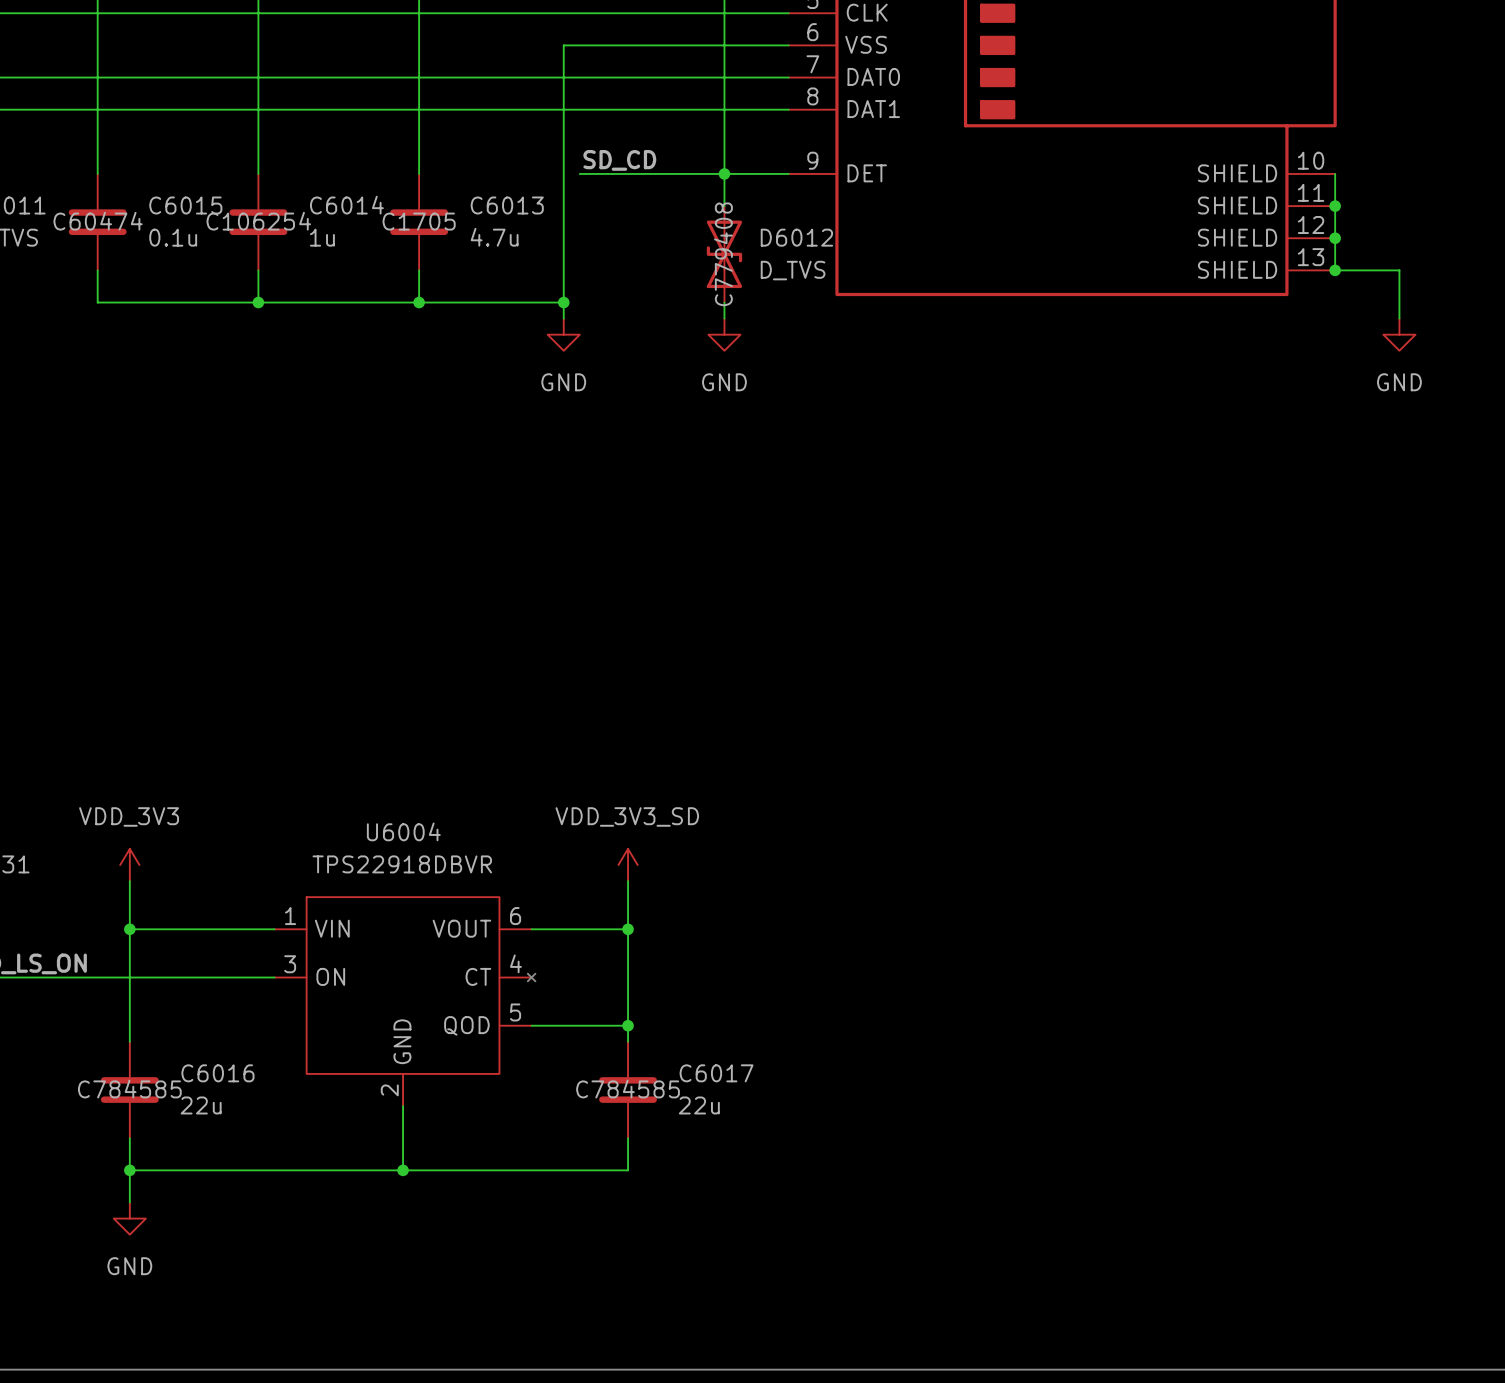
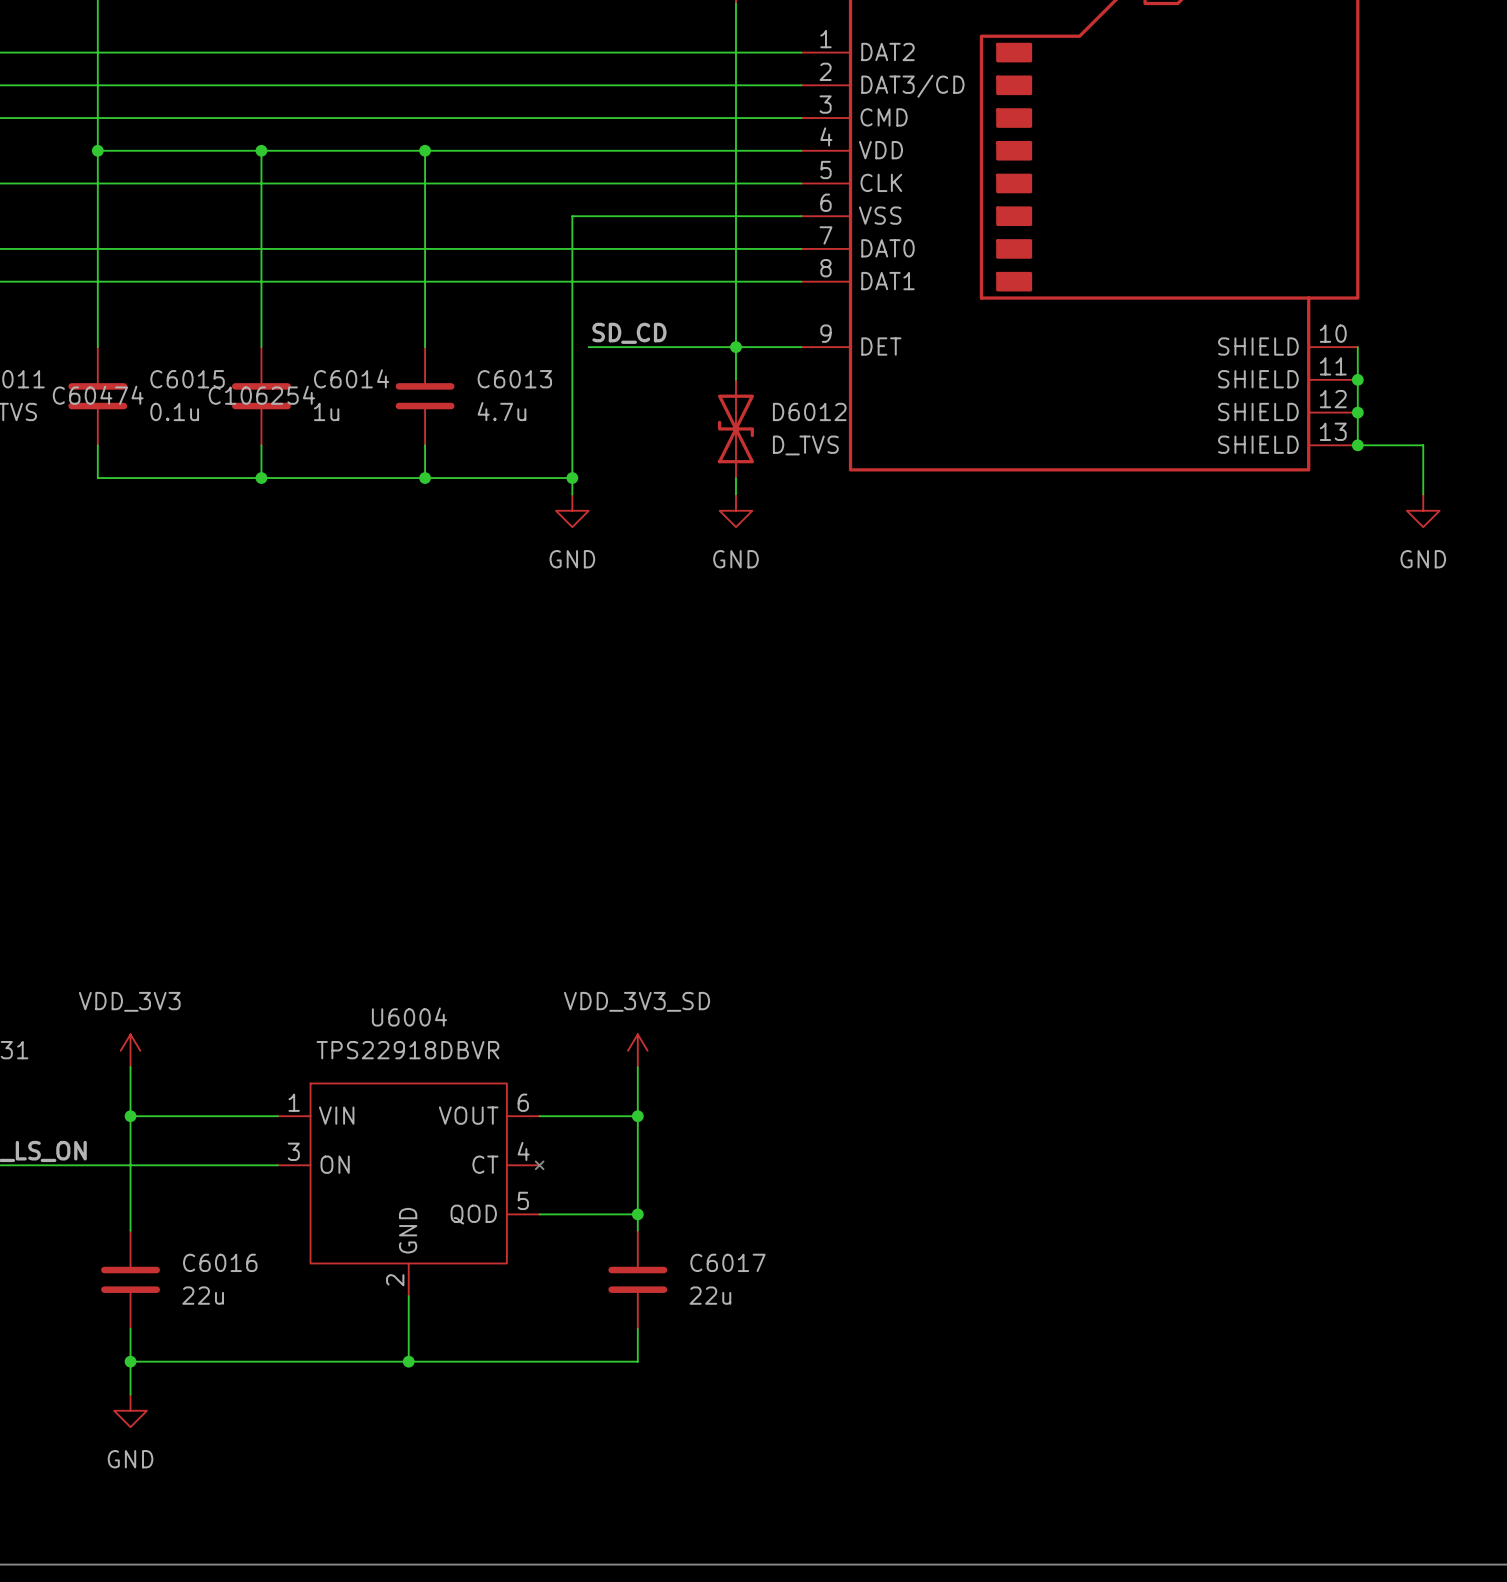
C6013 text: C1705 (419, 221) -> none
D6012 text: C779408 (723, 254) -> none
C6016 text: C784585 (129, 1089) -> none
C6017 text: C784585 (628, 1089) -> none

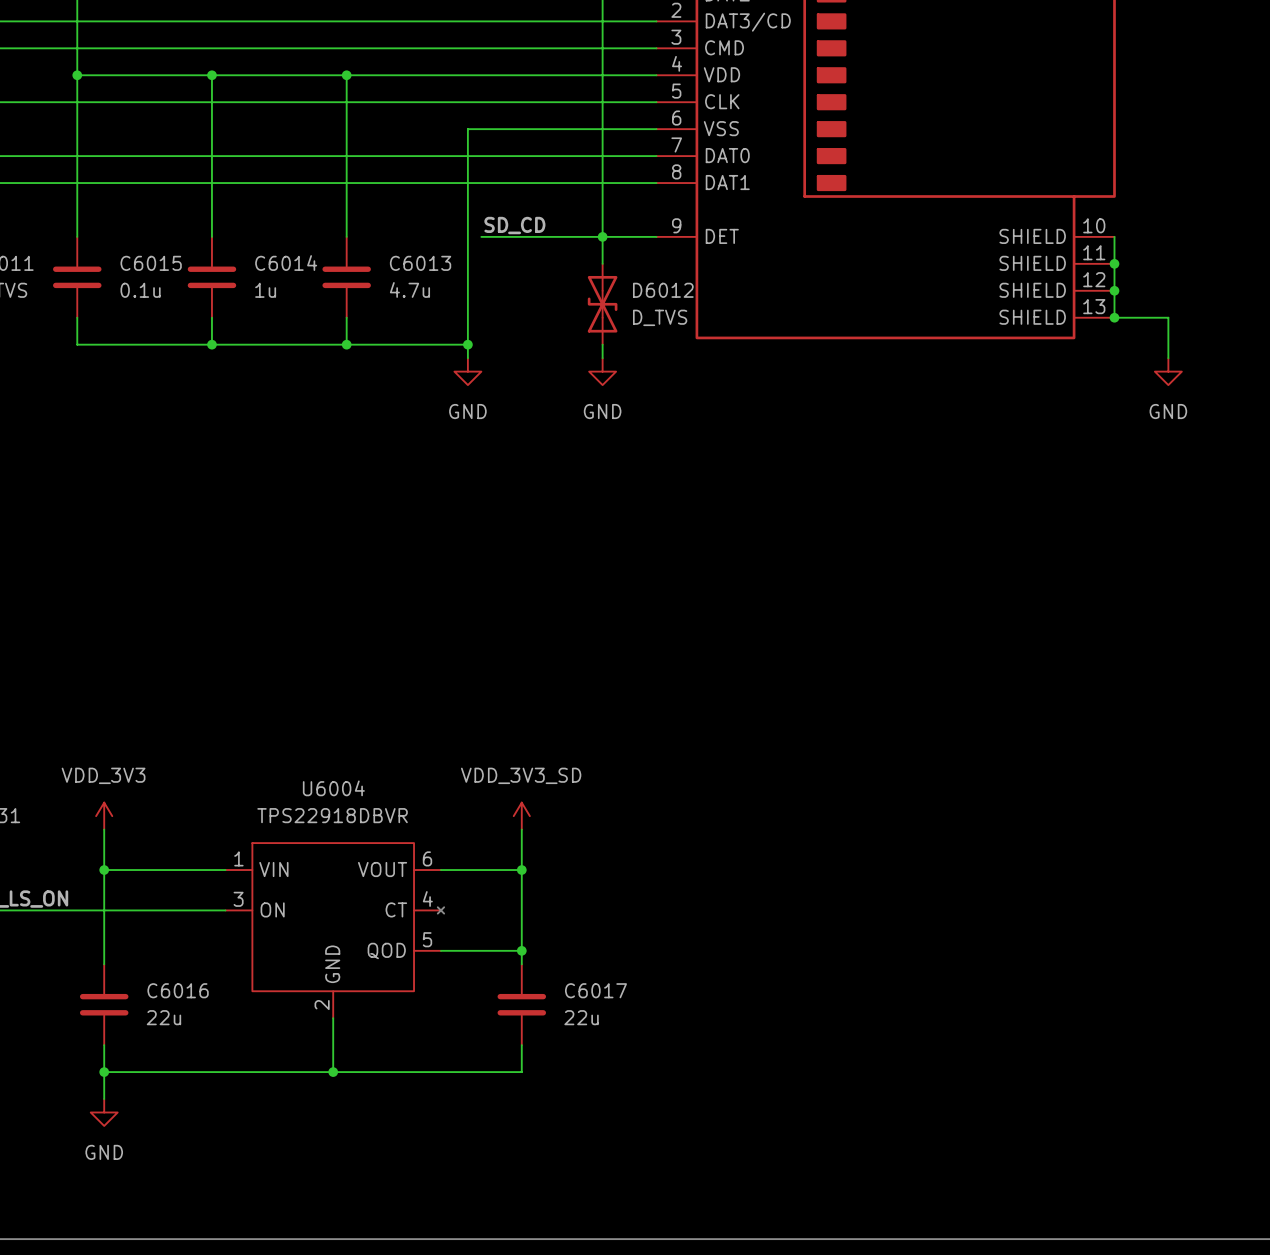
C6015 text: C60474 (98, 395) -> none
C6014 text: C106254 (261, 395) -> none

